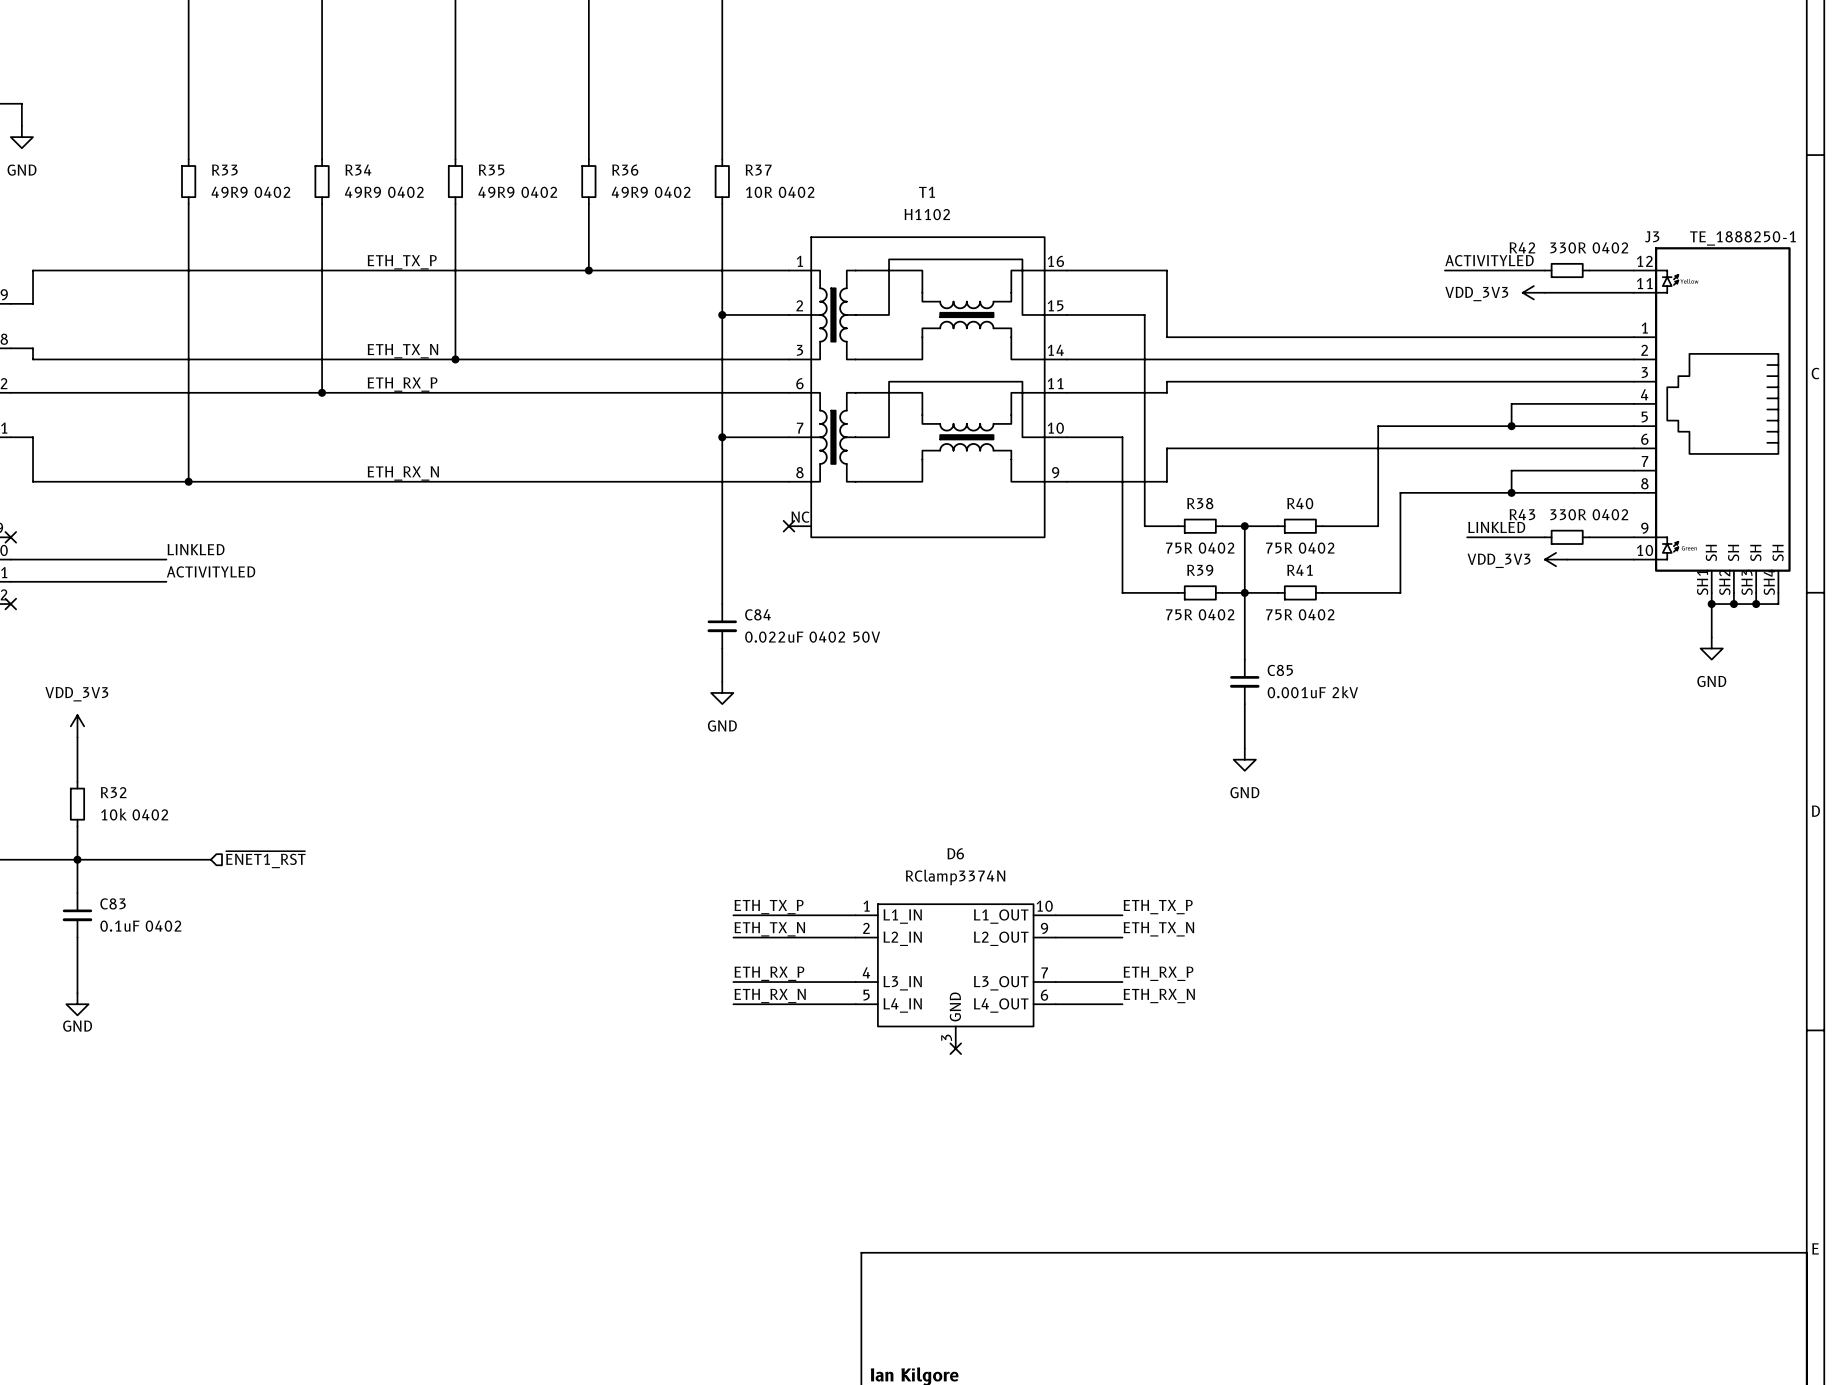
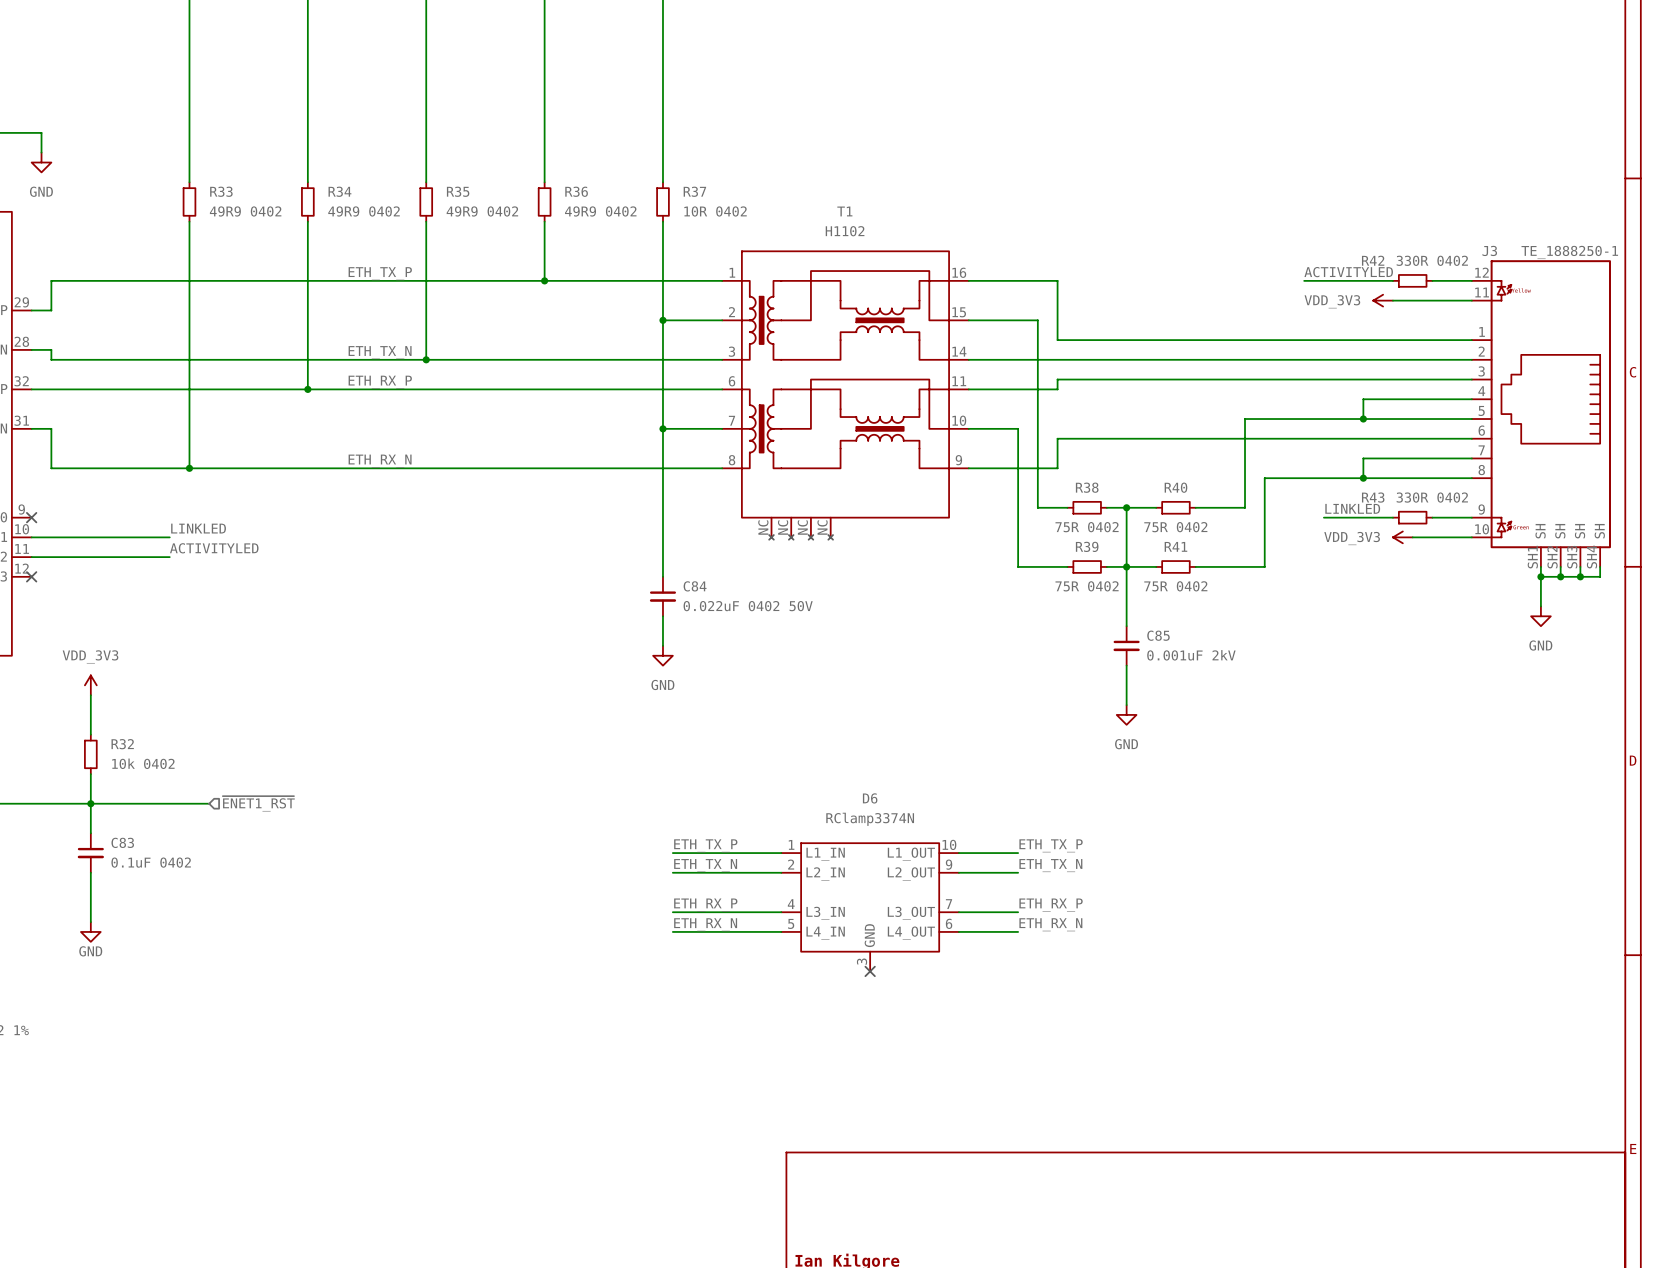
T1 symbol: [788, 237, 1067, 538] -> [722, 251, 969, 540]
no-connect mark: (788, 526) -> none

